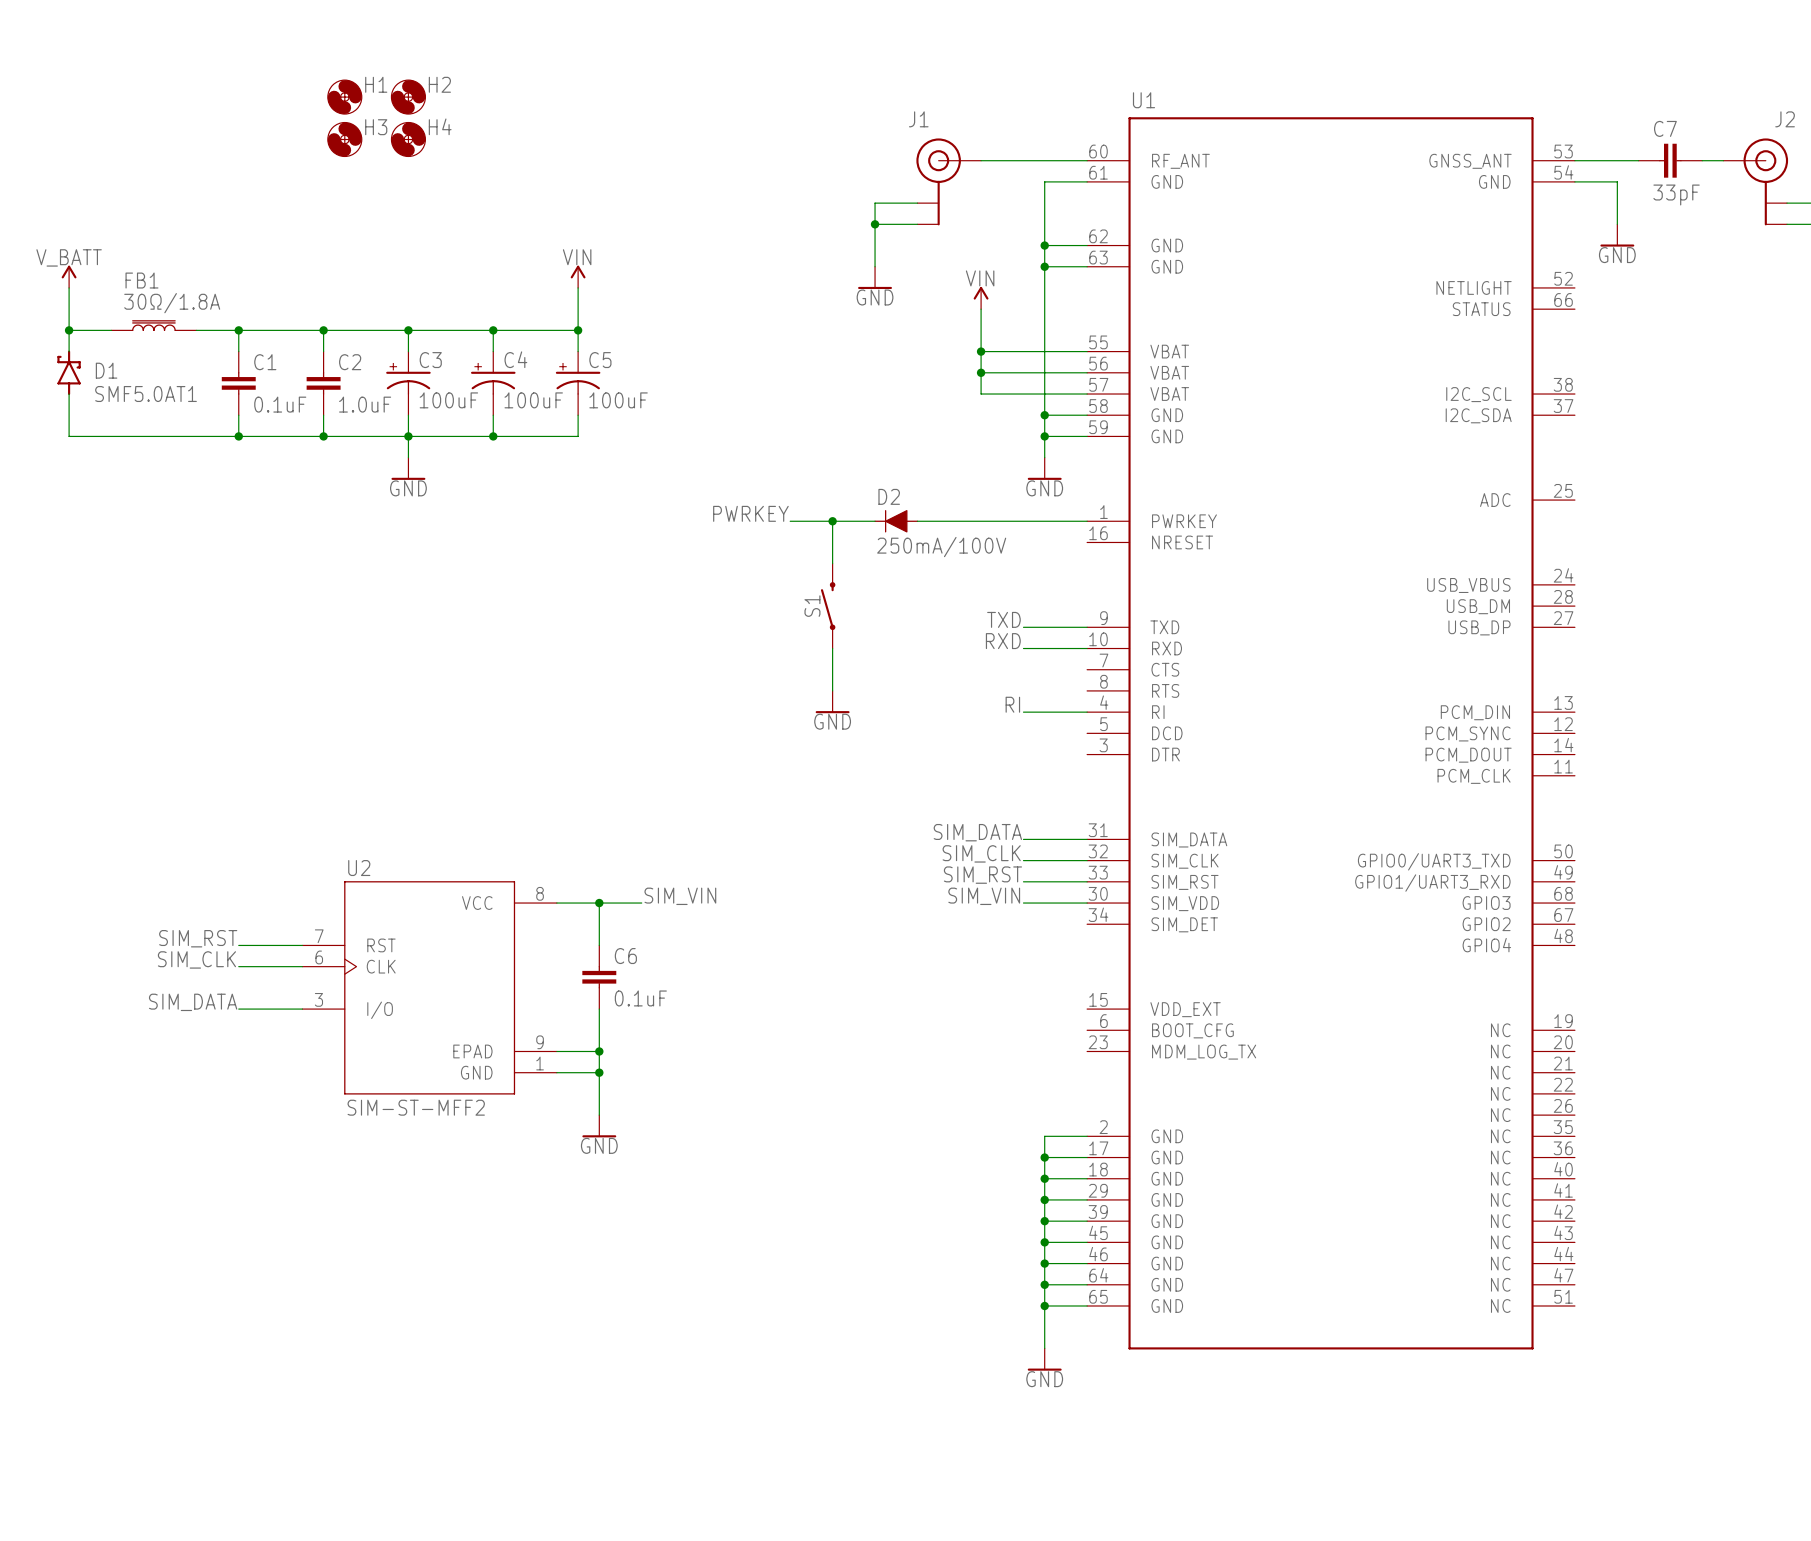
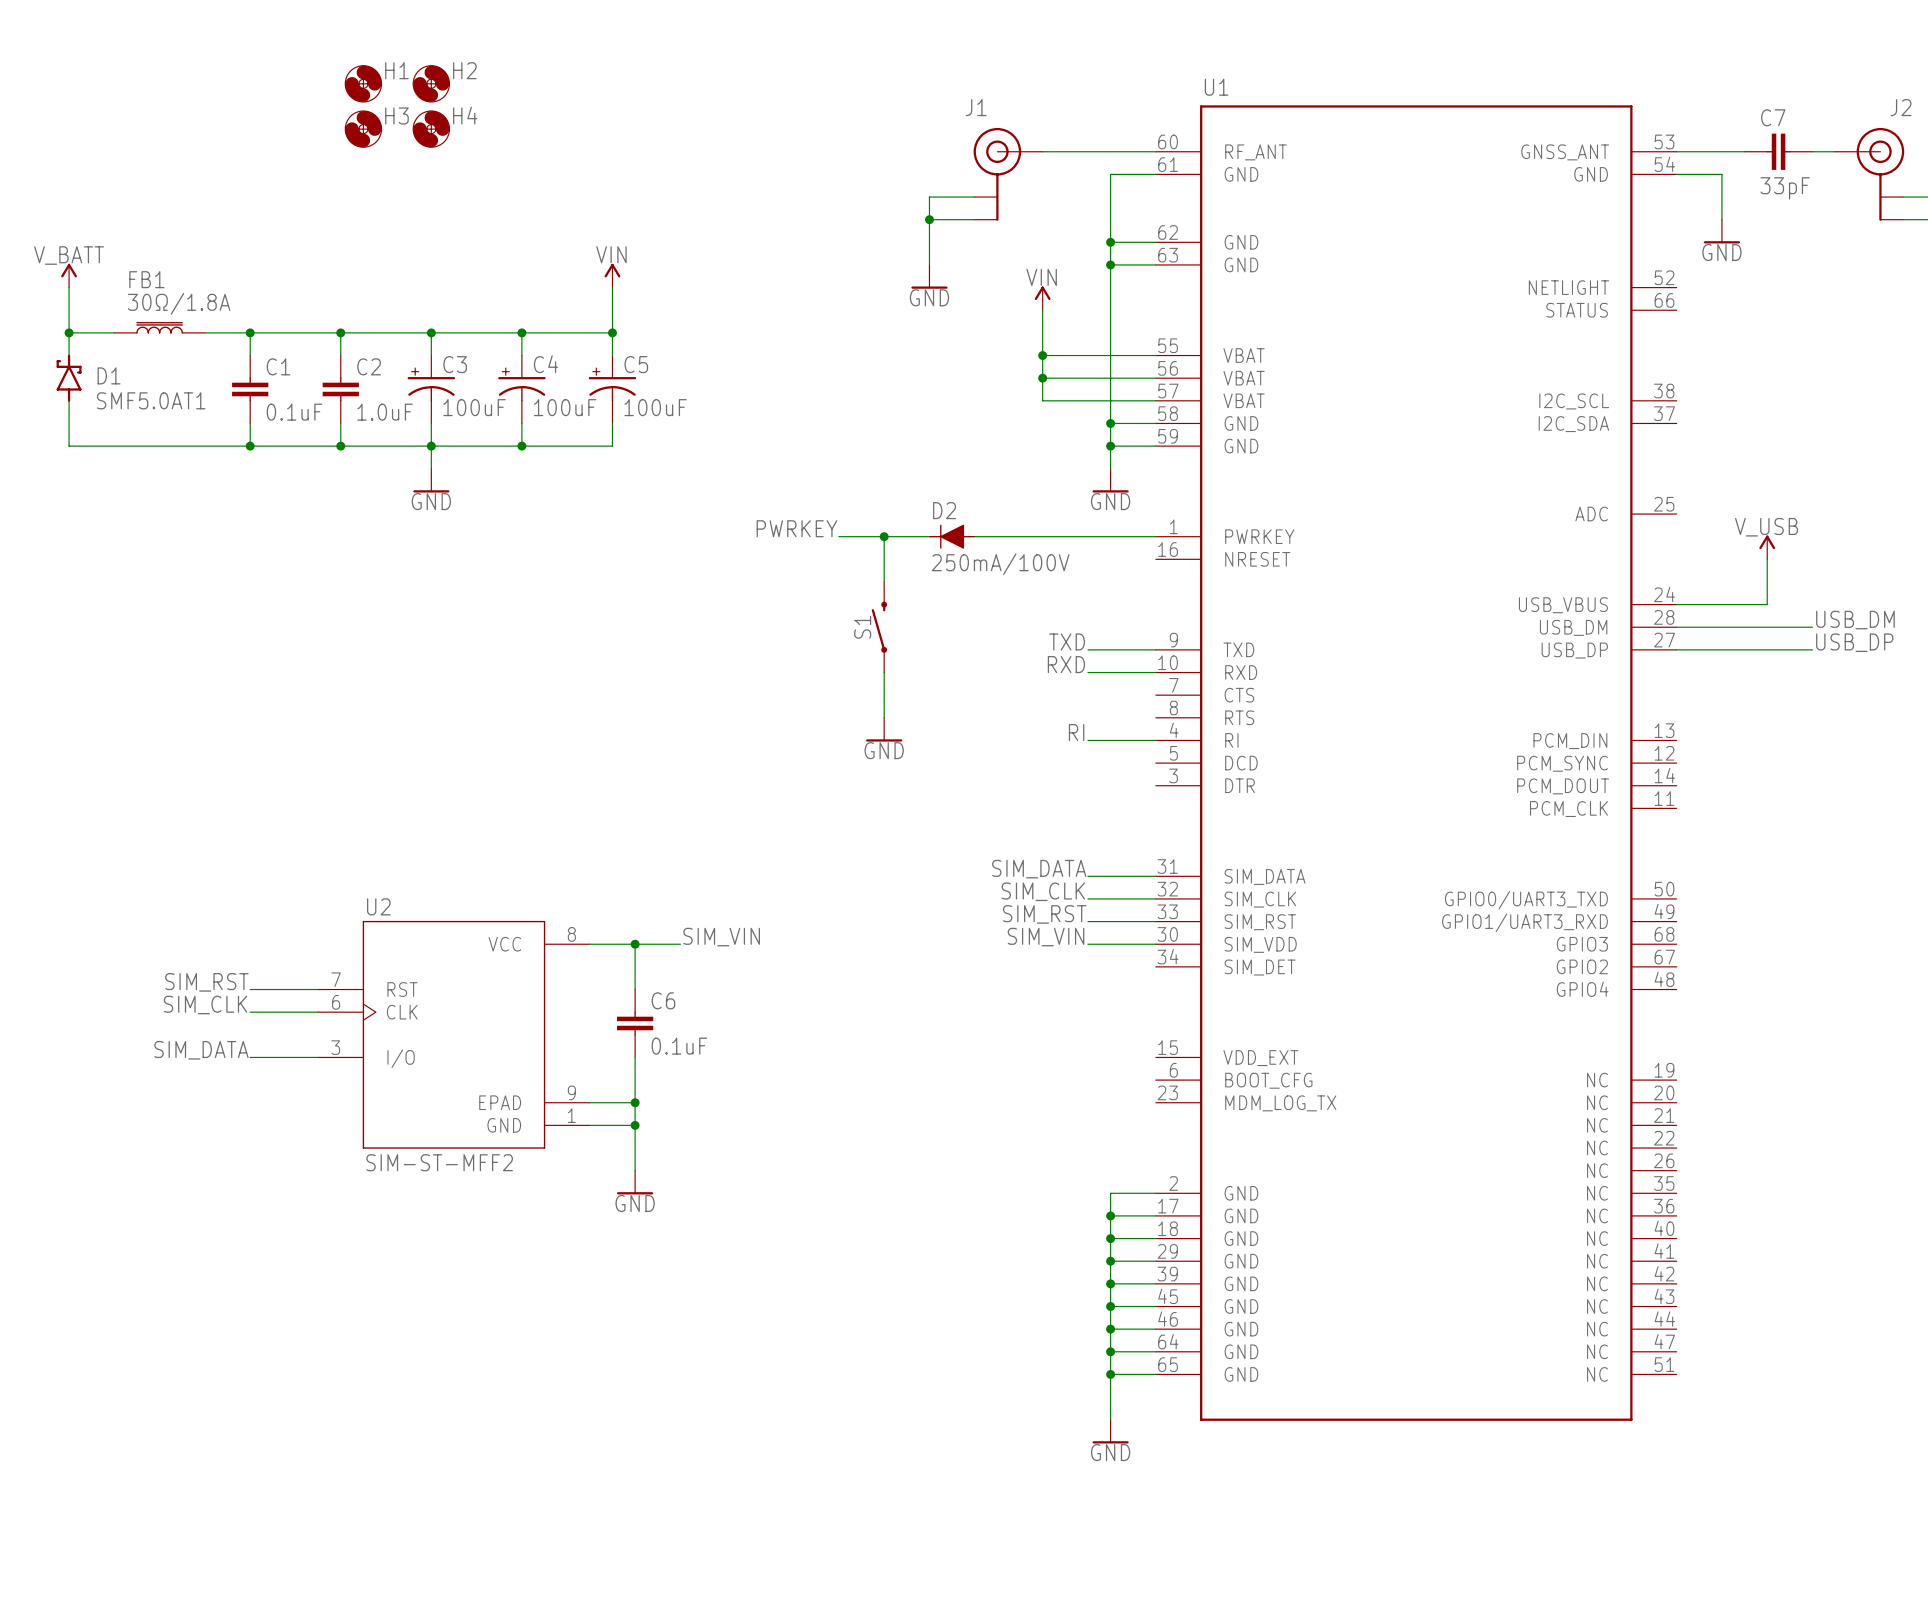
power symbol: none -> V_USB (1767, 547)
wire: none -> (1767, 559) (1767, 604) (1676, 604)
label: none -> USB_DM (1855, 620)
wire: none -> (1676, 627) (1812, 627)
label: none -> USB_DP (1854, 642)
wire: none -> (1676, 649) (1812, 649)

